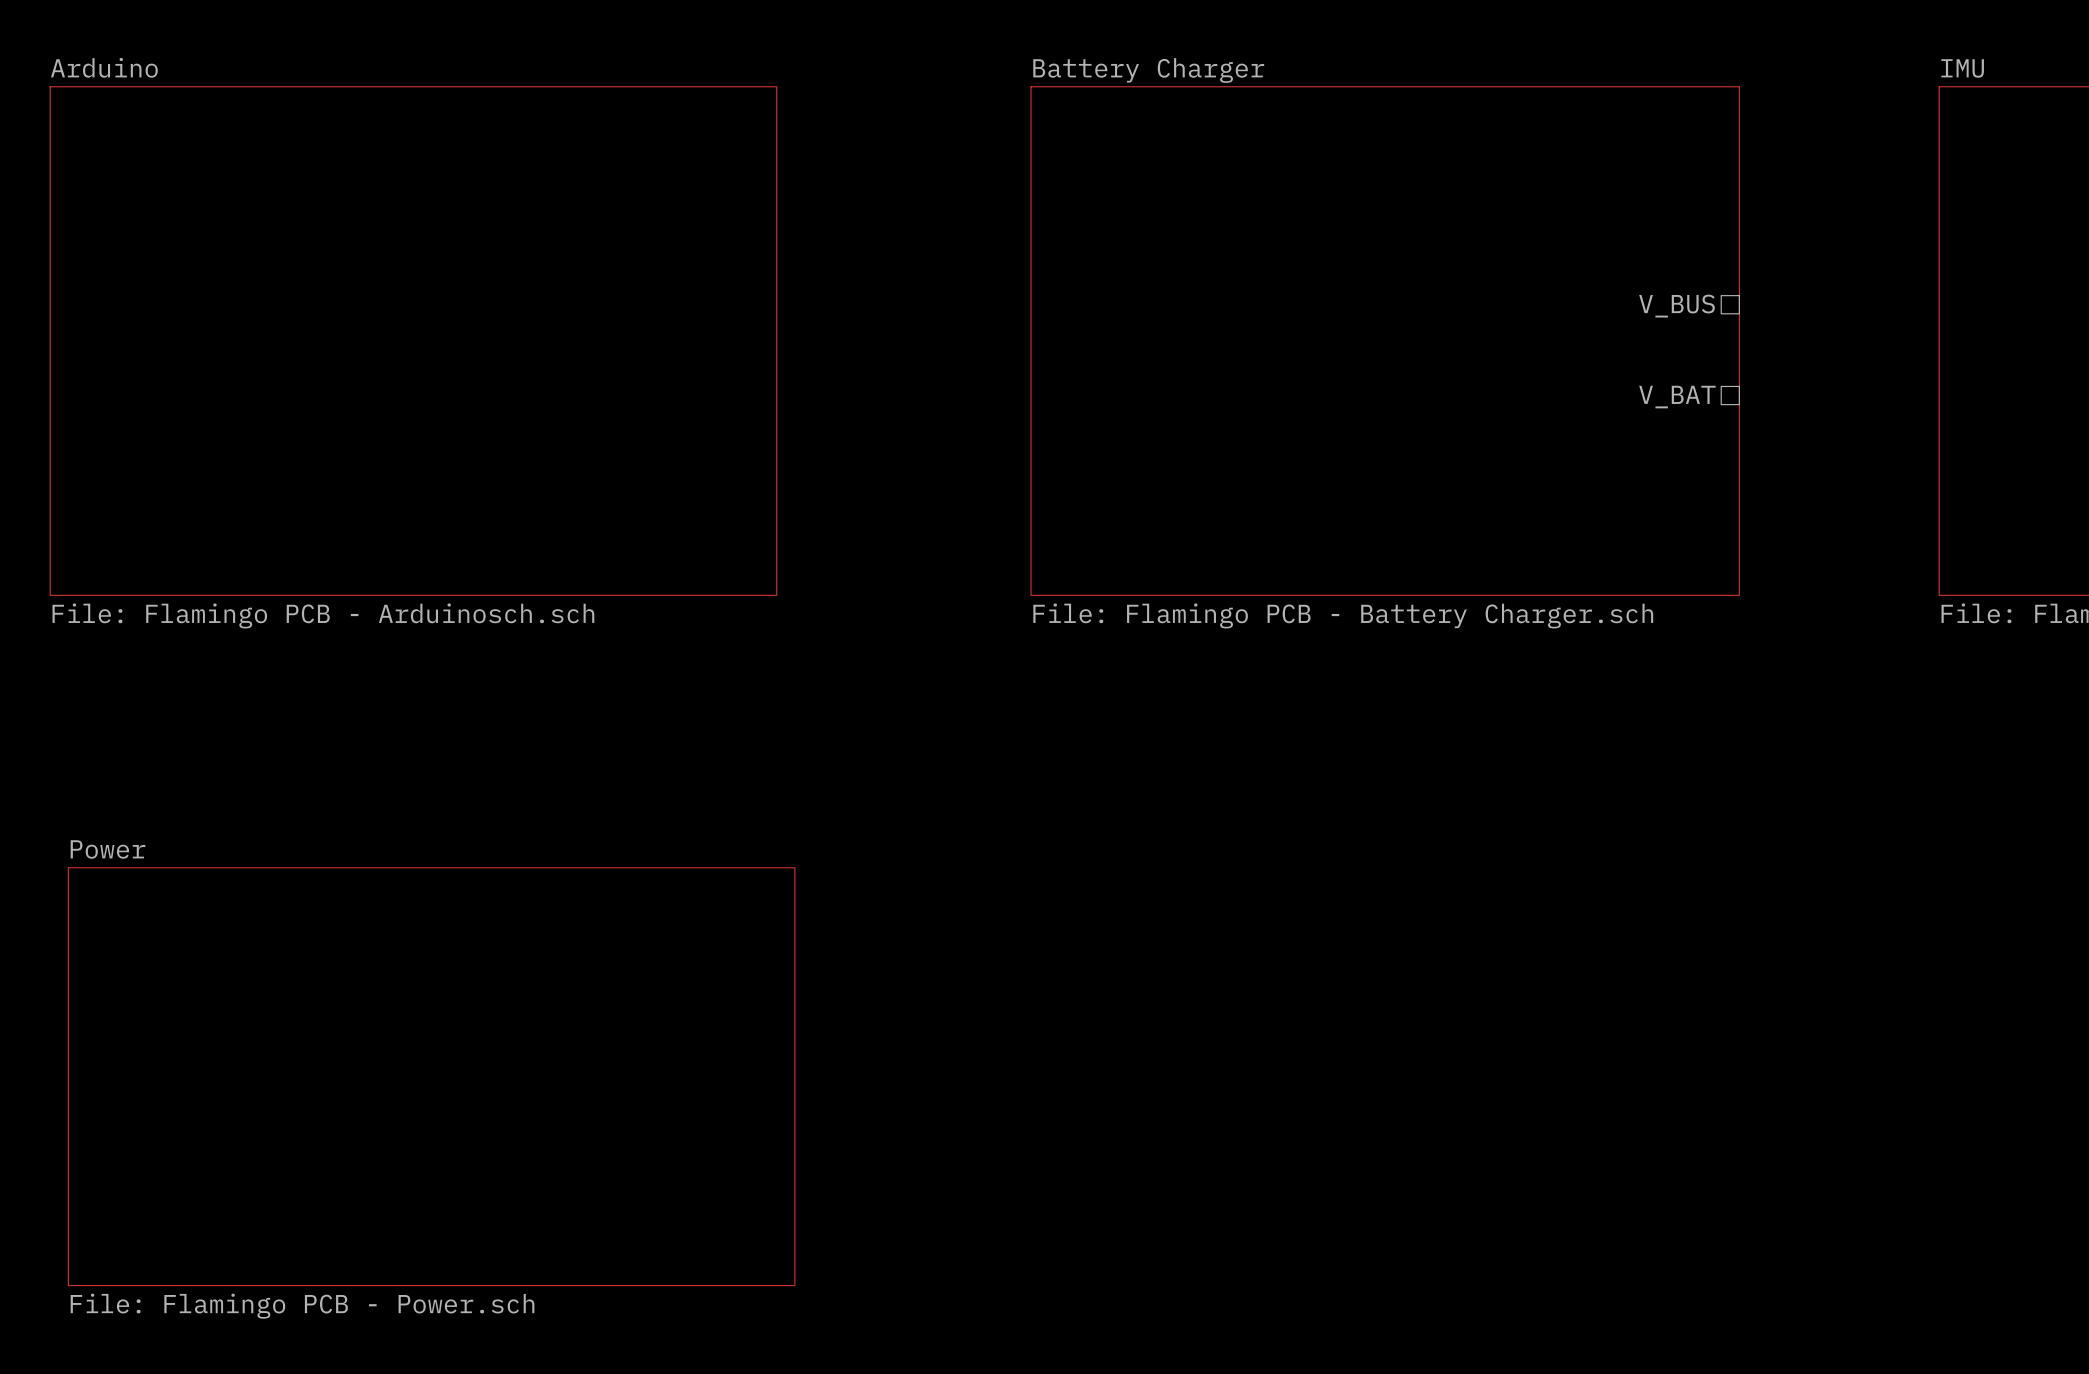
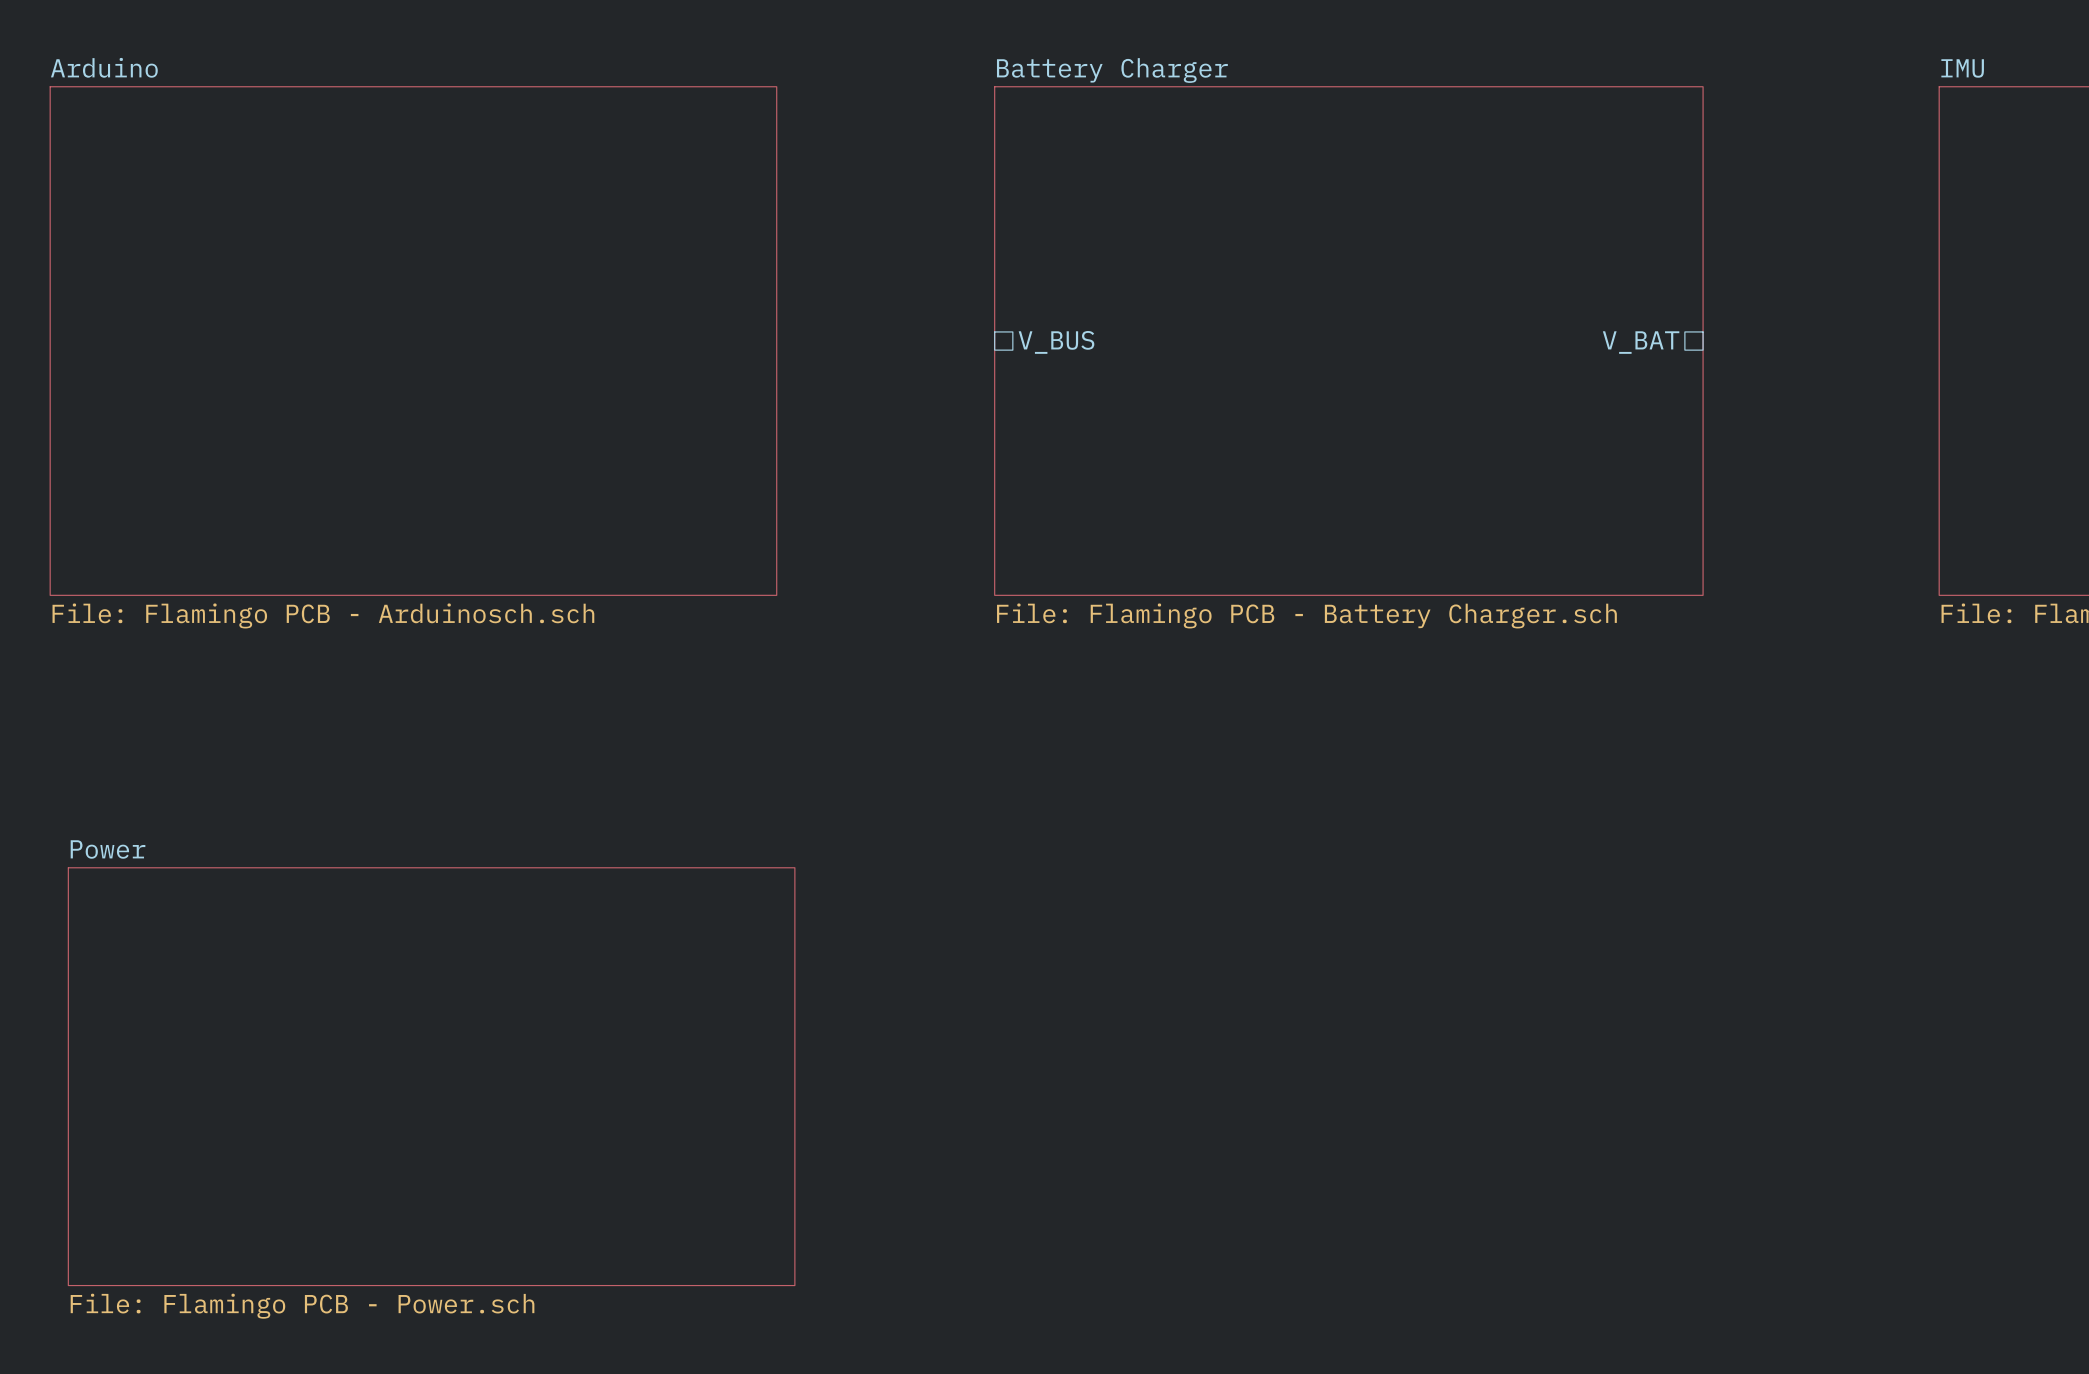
sheet pin: V_BUS (1677, 306) -> none
sheet Battery Charger position: (1385, 341) -> (1348, 341)
sheet pin: none -> V_BUS (1056, 342)
sheet pin position: V_BAT (1677, 397) -> V_BAT (1641, 342)

